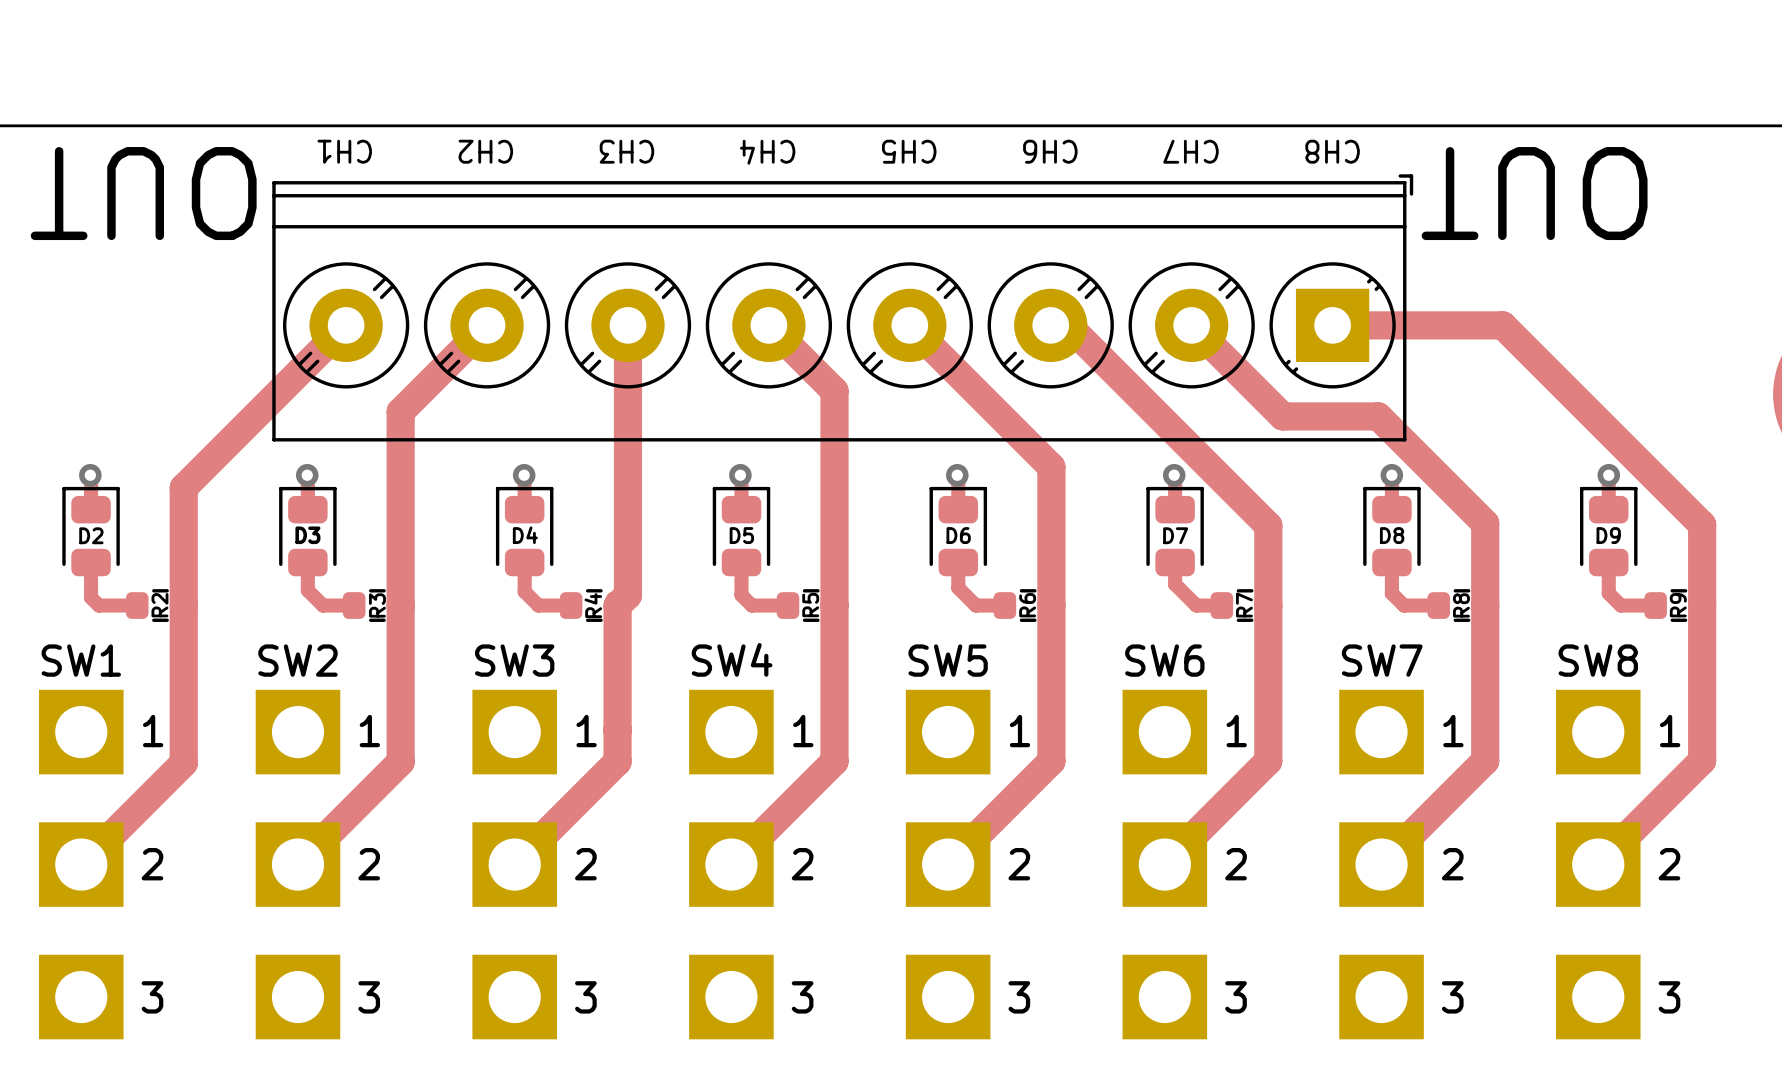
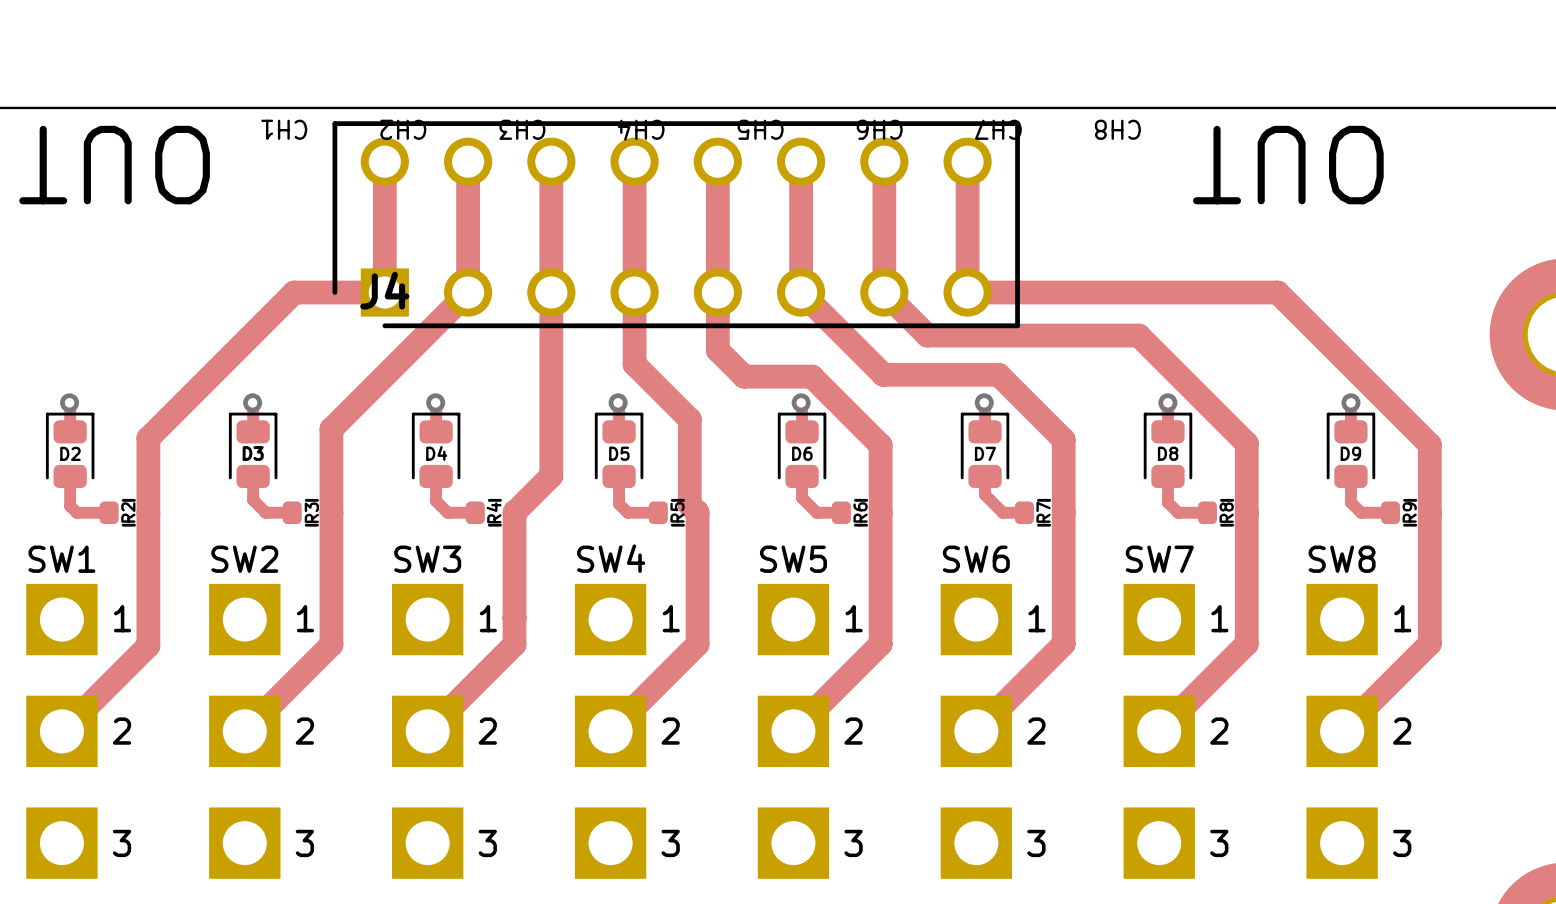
J4: none -> (676, 224)
part: (842, 307) -> none
track: (346, 325) (183, 487) (183, 517) -> (384, 161) (384, 292) (294, 292) (148, 438)
track: (487, 325) (400, 411) (400, 506) -> (468, 161) (468, 292) (331, 429)
track: (627, 325) (627, 595) -> (551, 161) (551, 475) (523, 503)
track: (768, 325) (834, 390) (834, 605) -> (634, 161) (634, 364) (689, 419) (689, 504) (697, 512)
track: (909, 325) (1051, 466) (1051, 525) -> (717, 161) (717, 350) (744, 376) (812, 376) (880, 445)
track: (1050, 325) (1068, 325) (1268, 525) -> (801, 161) (801, 292) (883, 374) (998, 374) (1063, 439) (1063, 445)
track: (1191, 325) (1282, 416) (1378, 416) -> (884, 161) (884, 292) (927, 335) (1138, 335) (1156, 353)
track: (1332, 325) (1502, 325) (1521, 344) -> (967, 161) (967, 292) (1277, 292)

